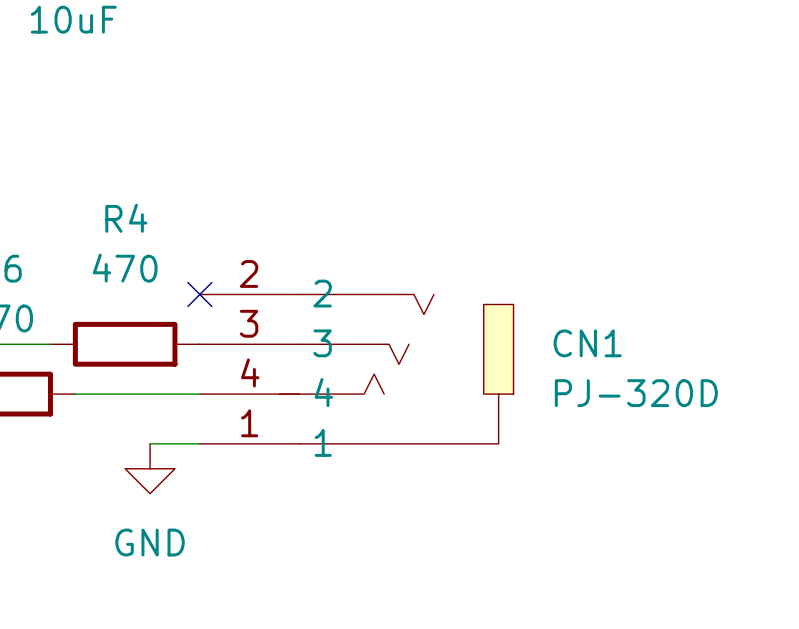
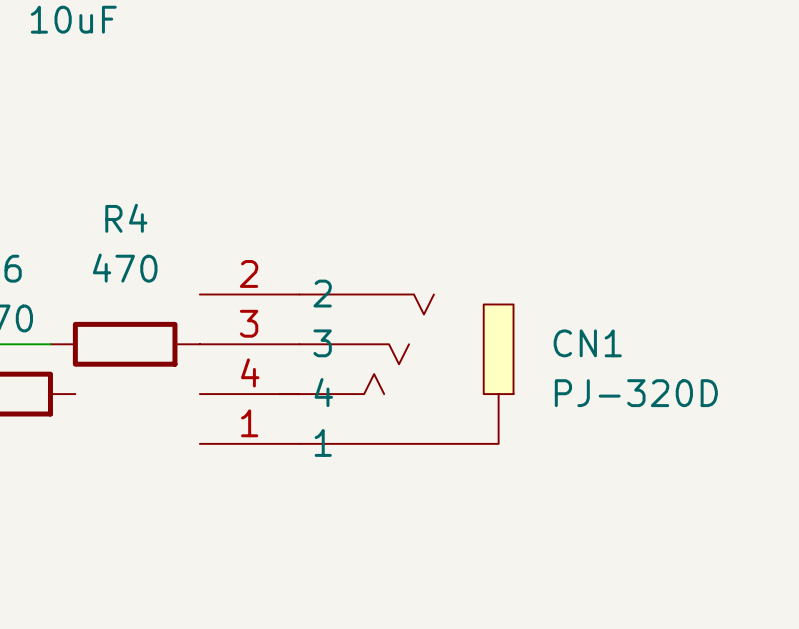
no-connect mark: (199, 294) -> none
wire: (75, 394) (199, 394) -> none
wire: (150, 443) (199, 443) -> none
power symbol: GND (150, 468) -> none

